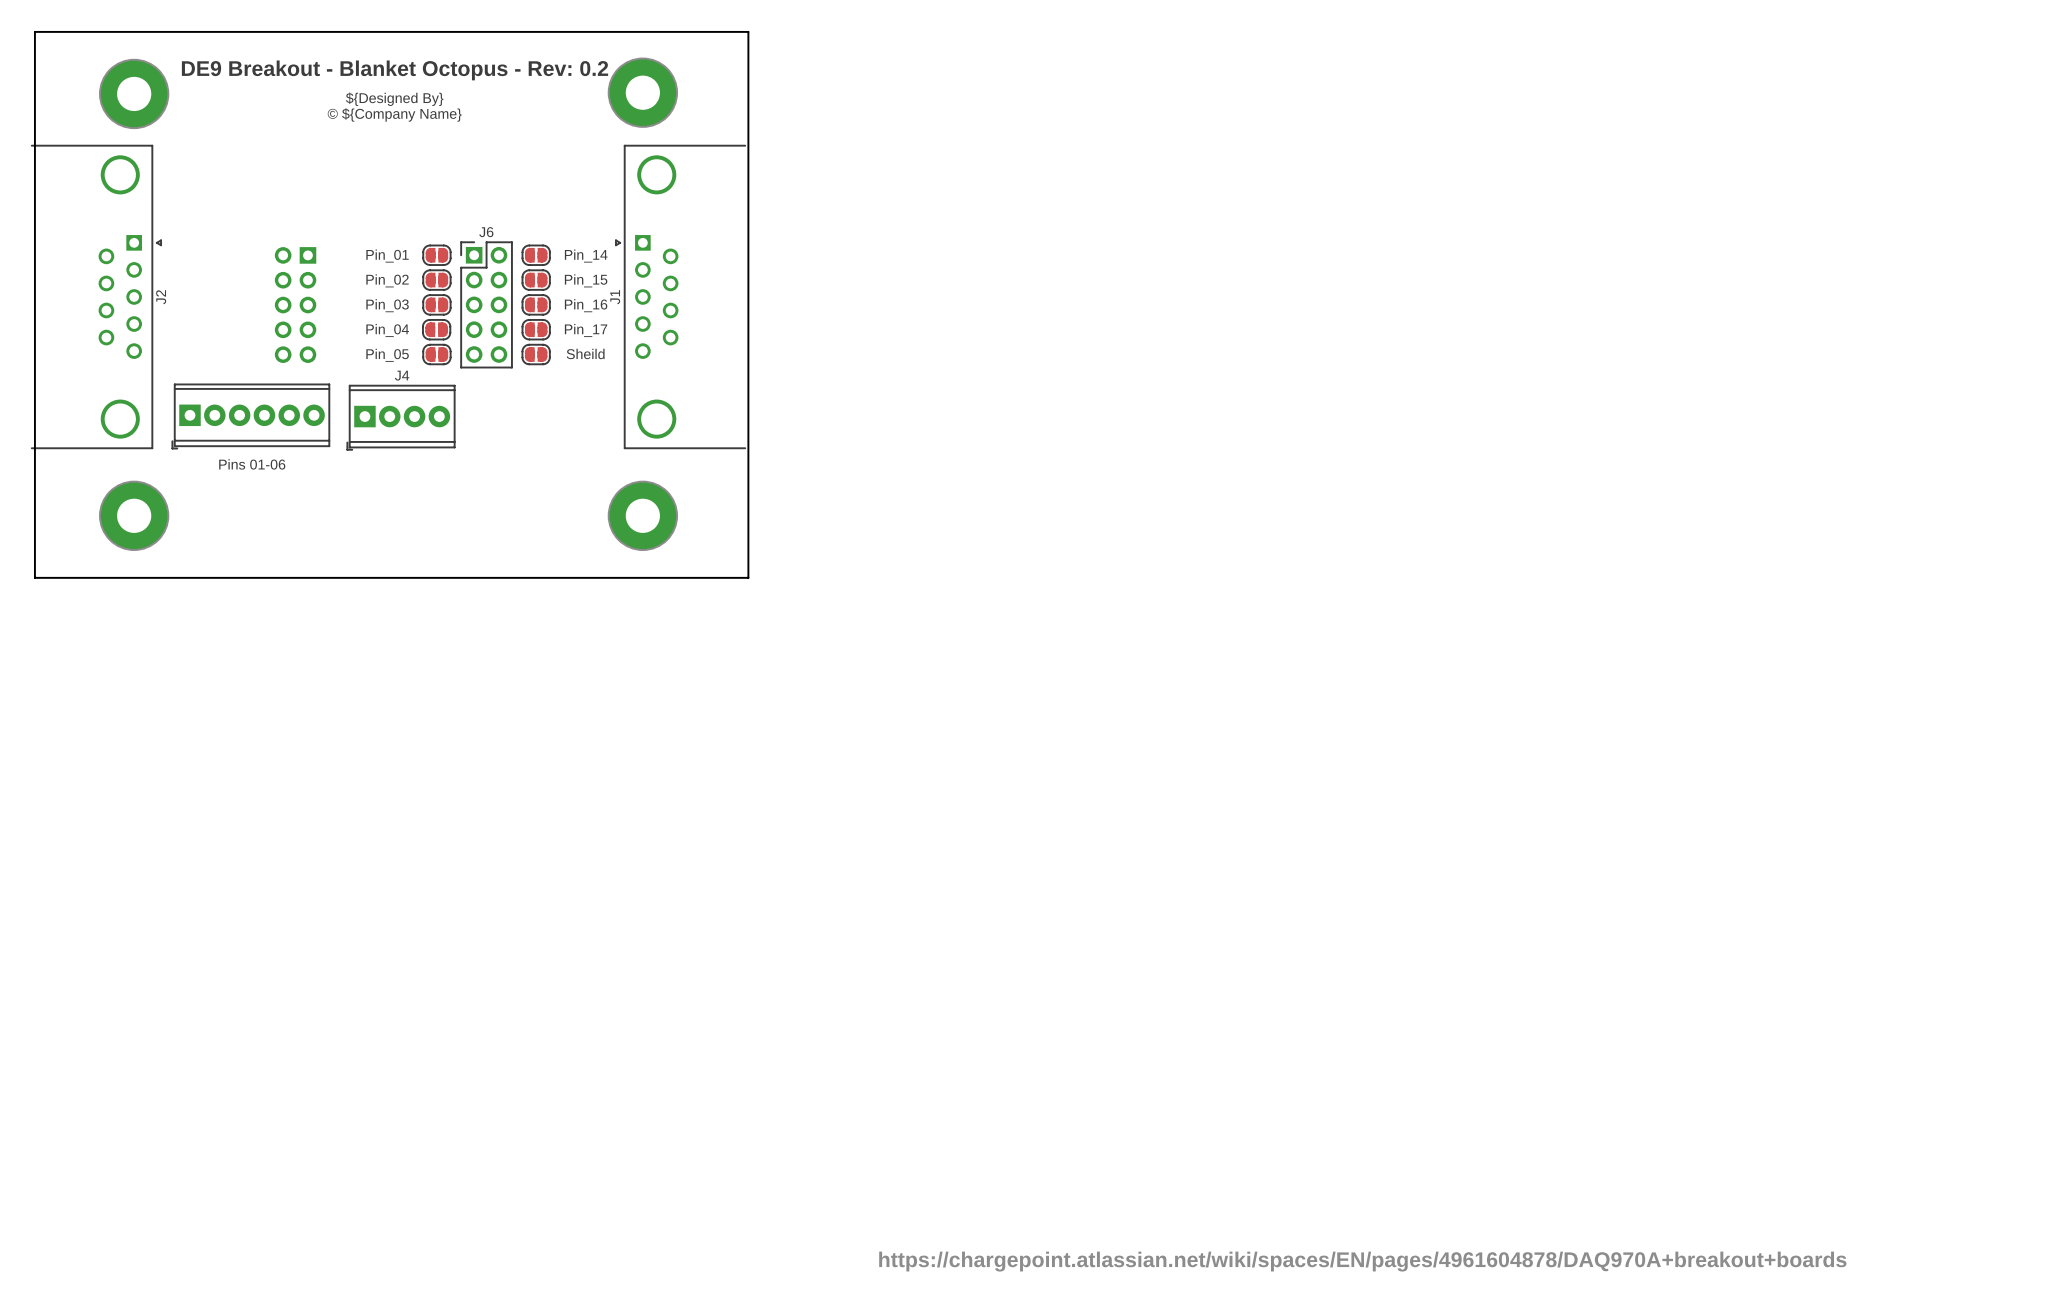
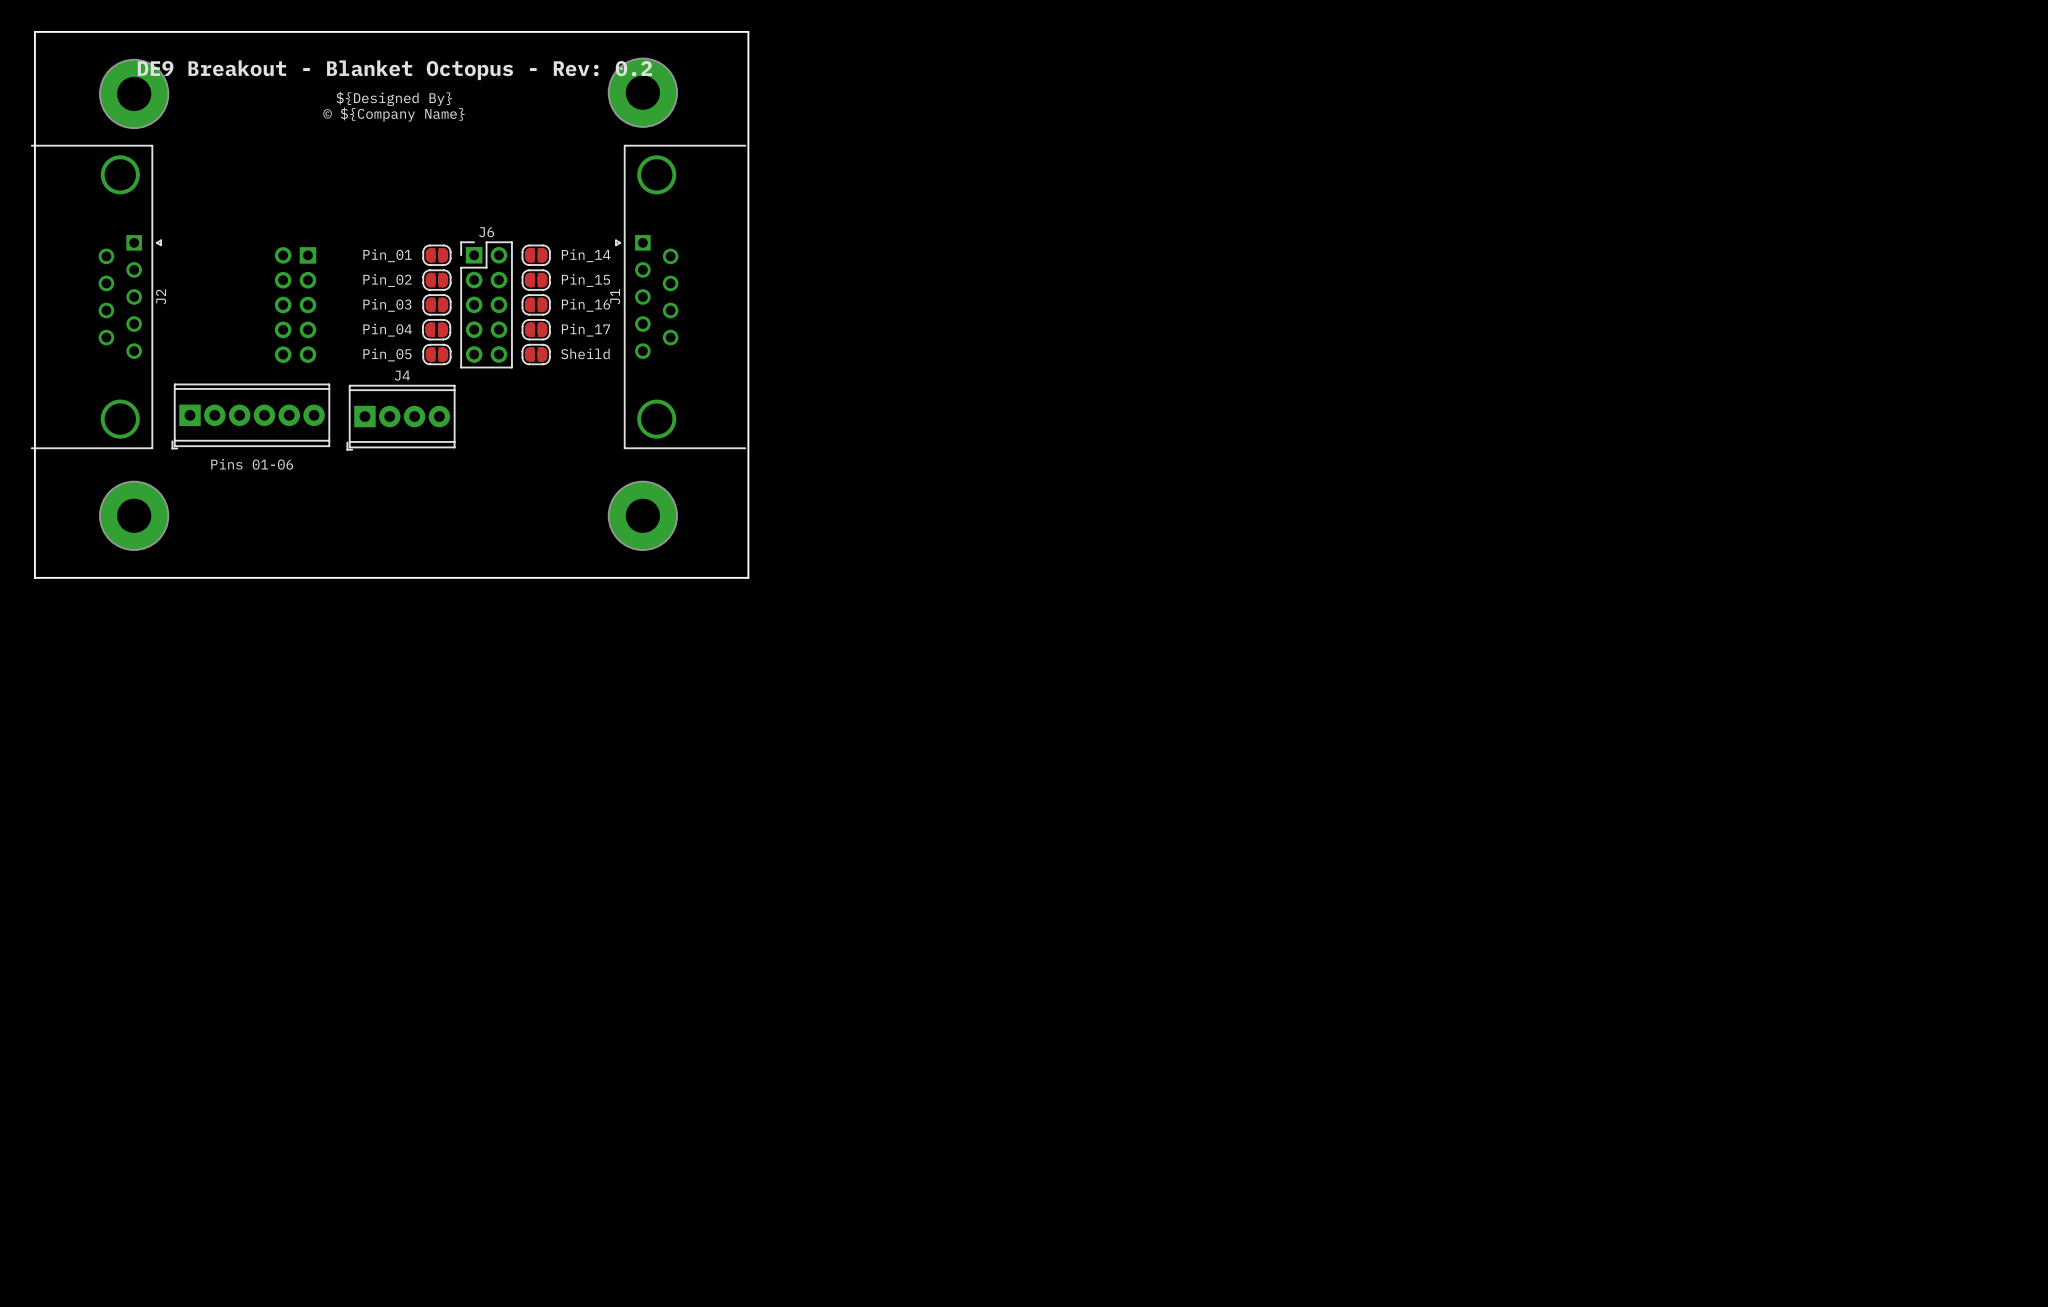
text: https://chargepoint.atlassian.net/wiki/spaces/EN/pages/4961604878/DAQ970A+breakout+boards (1362, 1261) -> none

